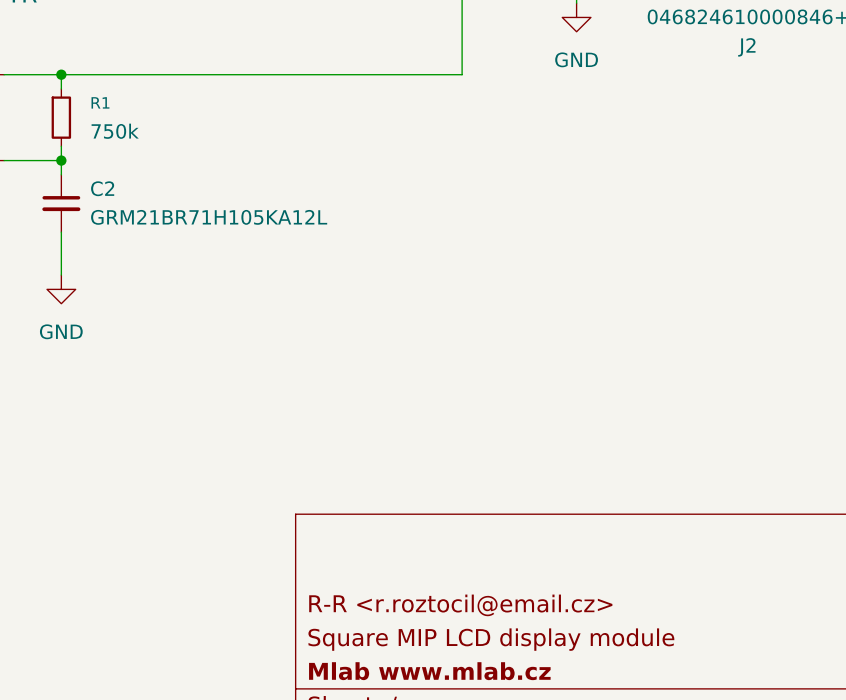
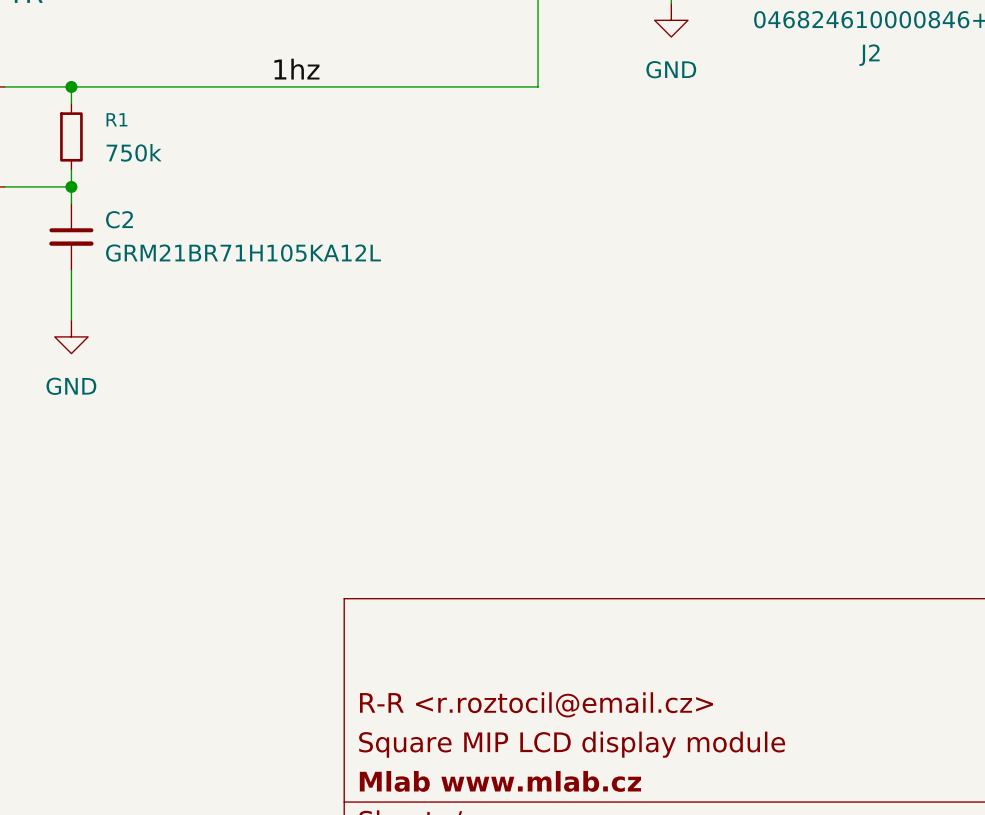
label: none -> 1hz (296, 69)

